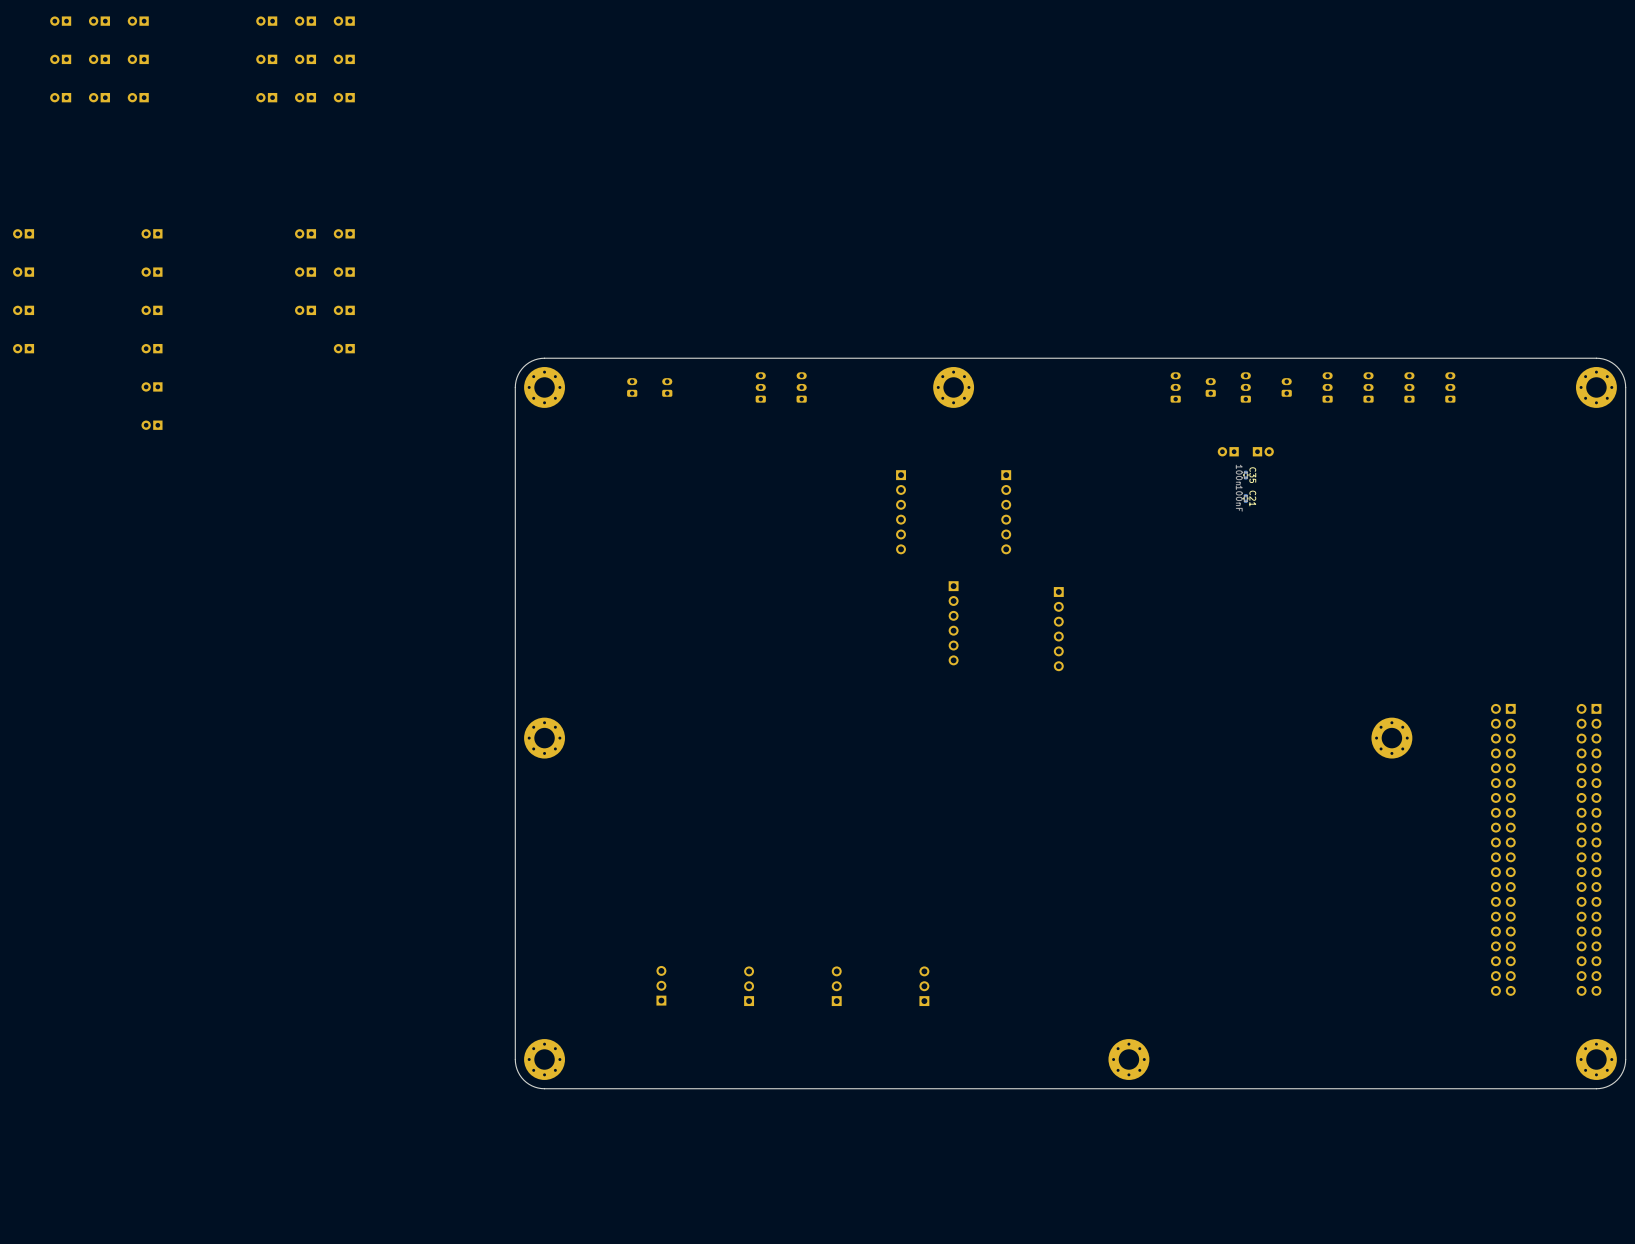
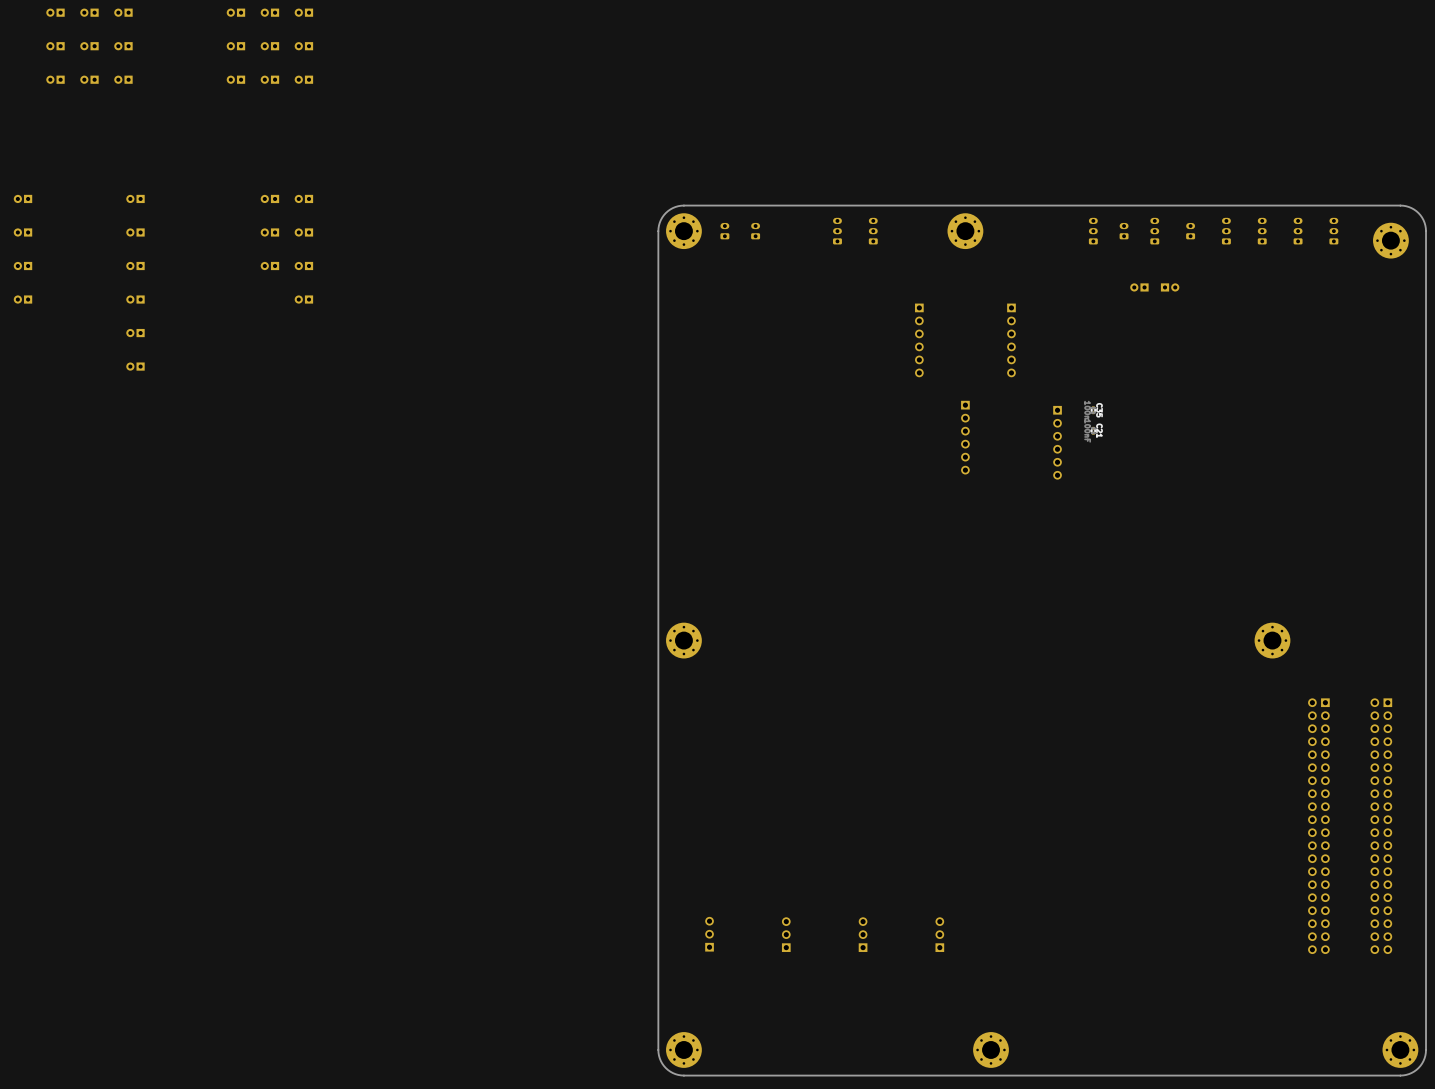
part: none -> (683, 231)
part: none -> (724, 231)
part: none -> (755, 231)
part: none -> (837, 231)
part: none -> (873, 231)
part: none -> (965, 231)
part: none -> (1093, 231)
part: none -> (1124, 231)
part: none -> (1154, 231)
part: none -> (1190, 231)
part: none -> (1226, 231)
part: none -> (1262, 231)
part: none -> (1298, 231)
part: none -> (1333, 231)
part: none -> (1139, 287)
part: none -> (1170, 287)
part: (544, 387) -> none
part: (632, 387) -> none
part: (667, 387) -> none
part: (760, 387) -> none
part: (801, 387) -> none
part: (953, 387) -> none
part: (1175, 387) -> none
part: (1210, 387) -> none
part: (1245, 387) -> none
part: (1286, 387) -> none
part: (1327, 387) -> none
part: (1368, 387) -> none
part: (1409, 387) -> none
part: (1450, 387) -> none
part position: (1596, 387) -> (1390, 240)
board edge: (1625, 387) (1622, 374) (1617, 366) (1606, 359) (1596, 358) (544, 358) (534, 359) (523, 366) (518, 374) (515, 387) (515, 1059) (519, 1075) (528, 1084) (544, 1088) (1596, 1088) (1606, 1087) (1617, 1080) (1622, 1072) (1625, 1059) -> (1426, 333) (1425, 225) (1418, 213) (1403, 205) (683, 205) (675, 207) (665, 213) (660, 220) (658, 231) (658, 1055) (667, 1069) (683, 1075) (1406, 1074) (1418, 1068) (1425, 1052) (1426, 922)
part: none -> (919, 340)
part: none -> (1011, 340)
part: (1228, 451) -> none
part: (1263, 451) -> none
part: none -> (965, 437)
part: (901, 512) -> none
part: (1006, 512) -> none
part: none -> (1057, 442)
part: (953, 623) -> none
part: (1058, 629) -> none
part: (544, 738) -> none
part: none -> (683, 640)
part position: (1391, 738) -> (1272, 640)
part: (1503, 849) -> none
part: (1589, 849) -> none
part: none -> (1318, 826)
part: none -> (1381, 826)
part: (661, 985) -> none
part: (749, 986) -> none
part: (836, 986) -> none
part: (924, 986) -> none
part: (544, 1059) -> none
part position: (1128, 1059) -> (991, 1049)
part position: (1596, 1059) -> (1400, 1049)
part: none -> (709, 934)
part: none -> (786, 934)
part: none -> (863, 934)
part: none -> (939, 934)
part: none -> (683, 1049)

